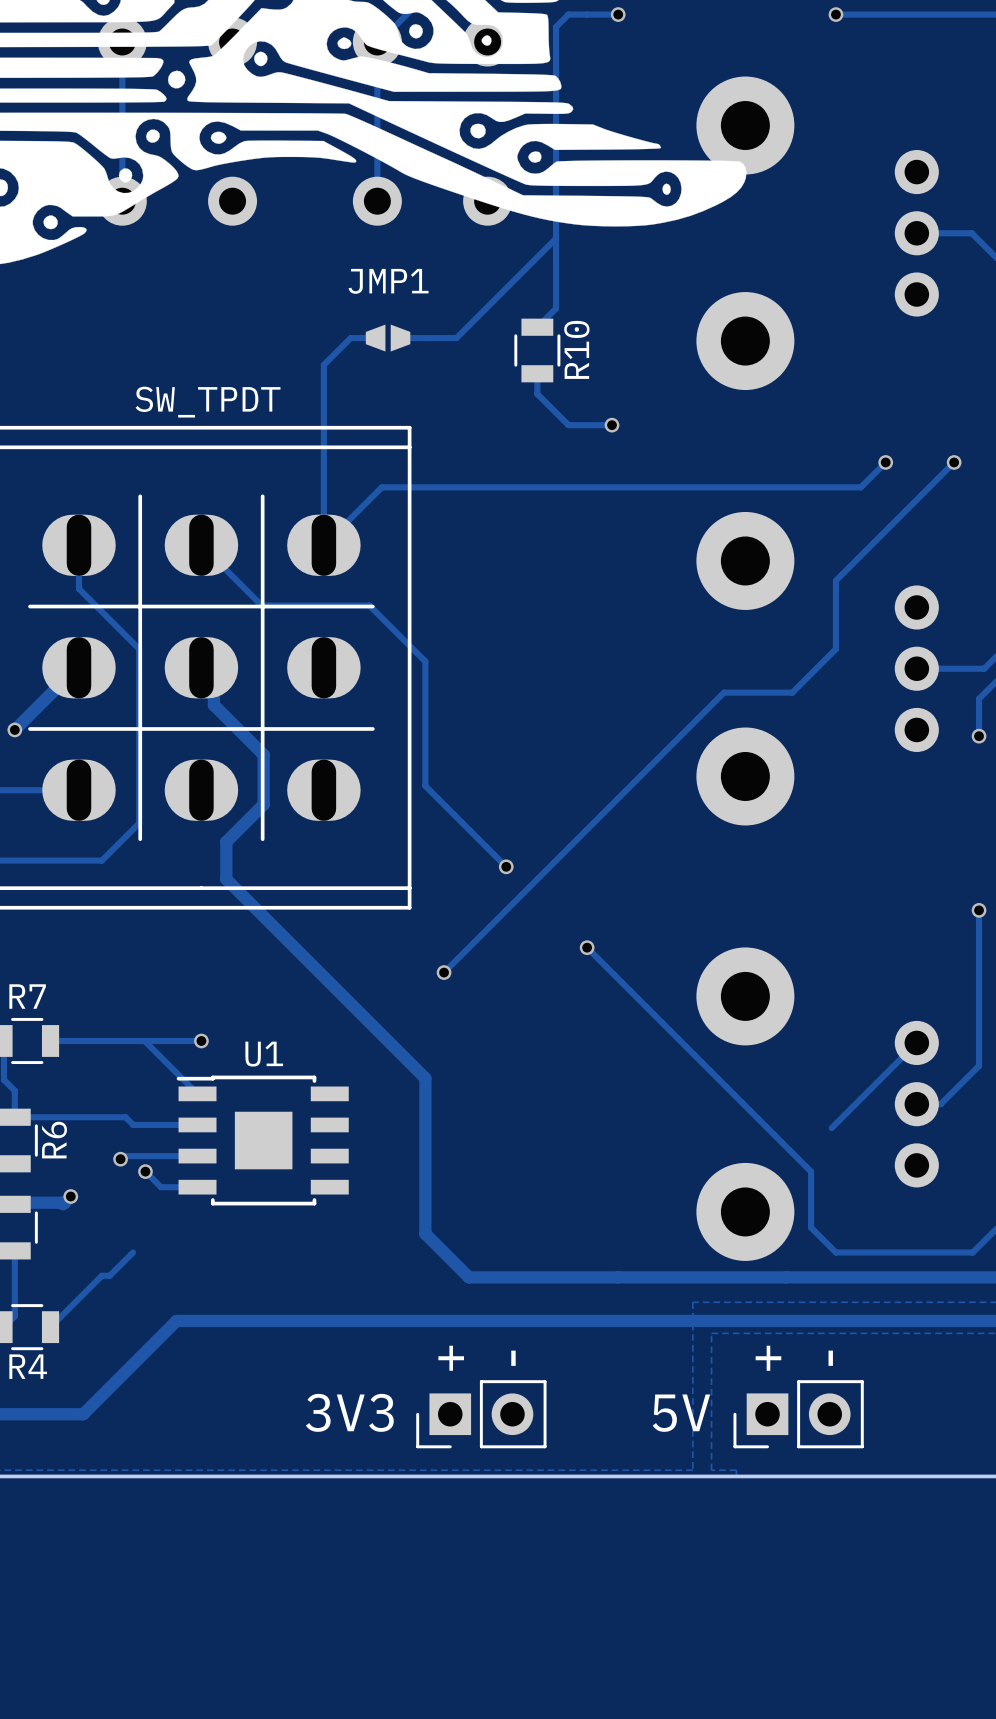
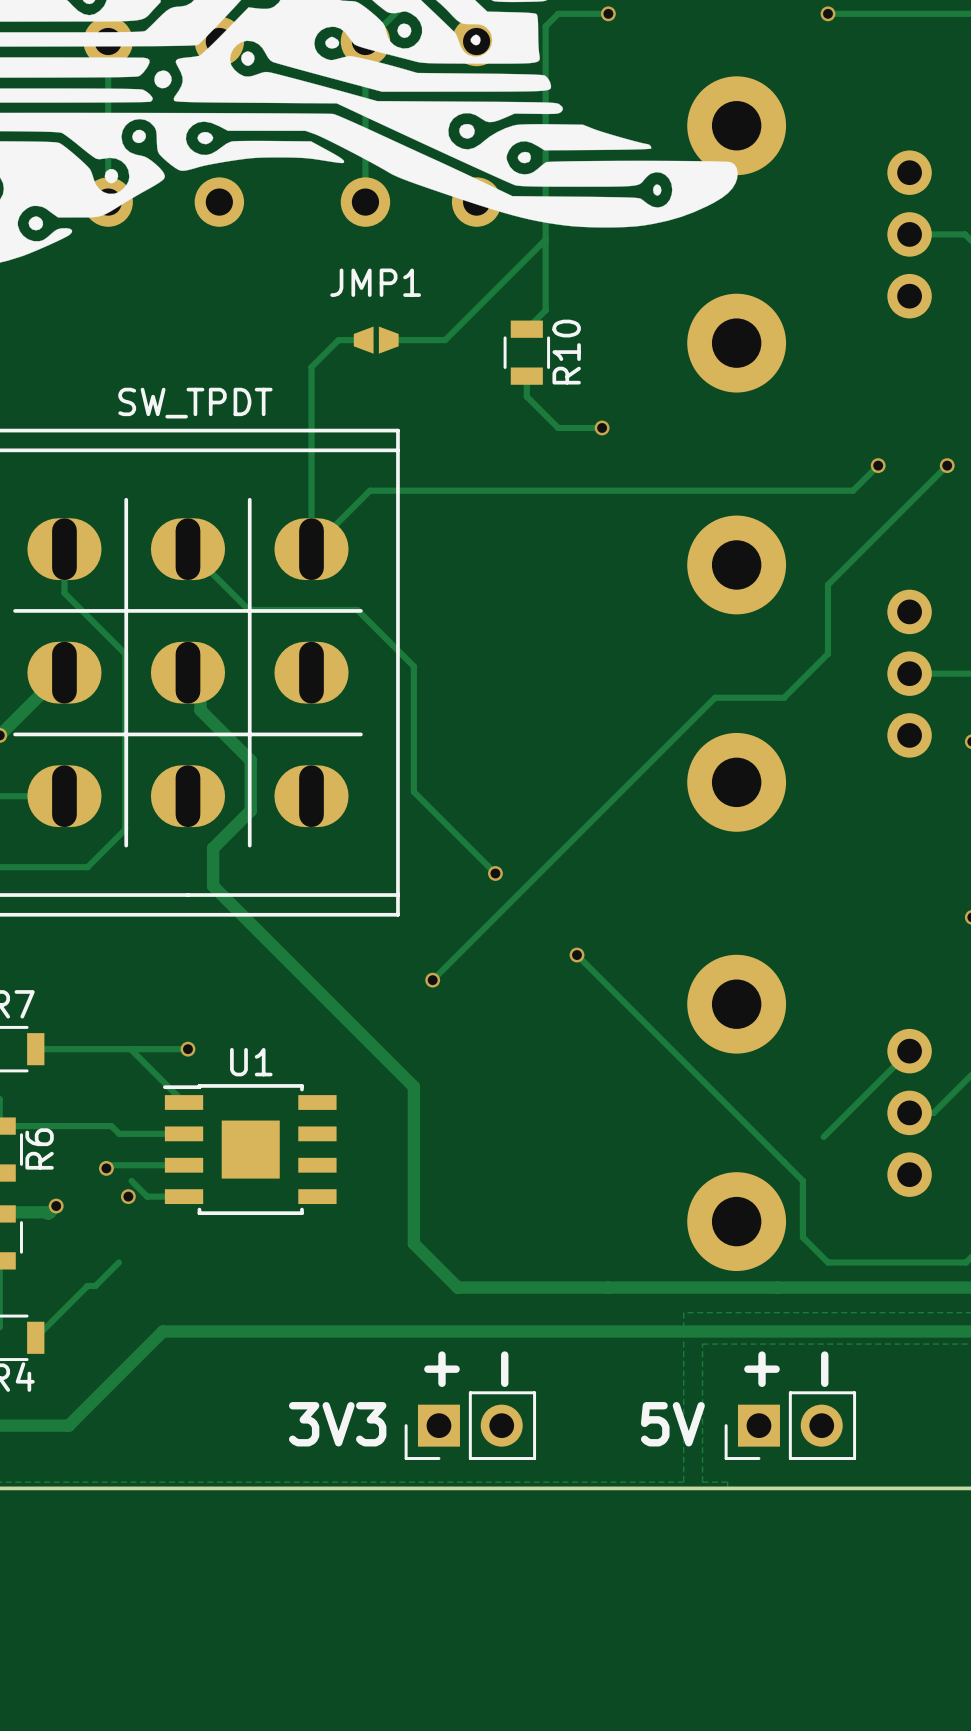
via position: (145, 1171) -> (128, 1196)

